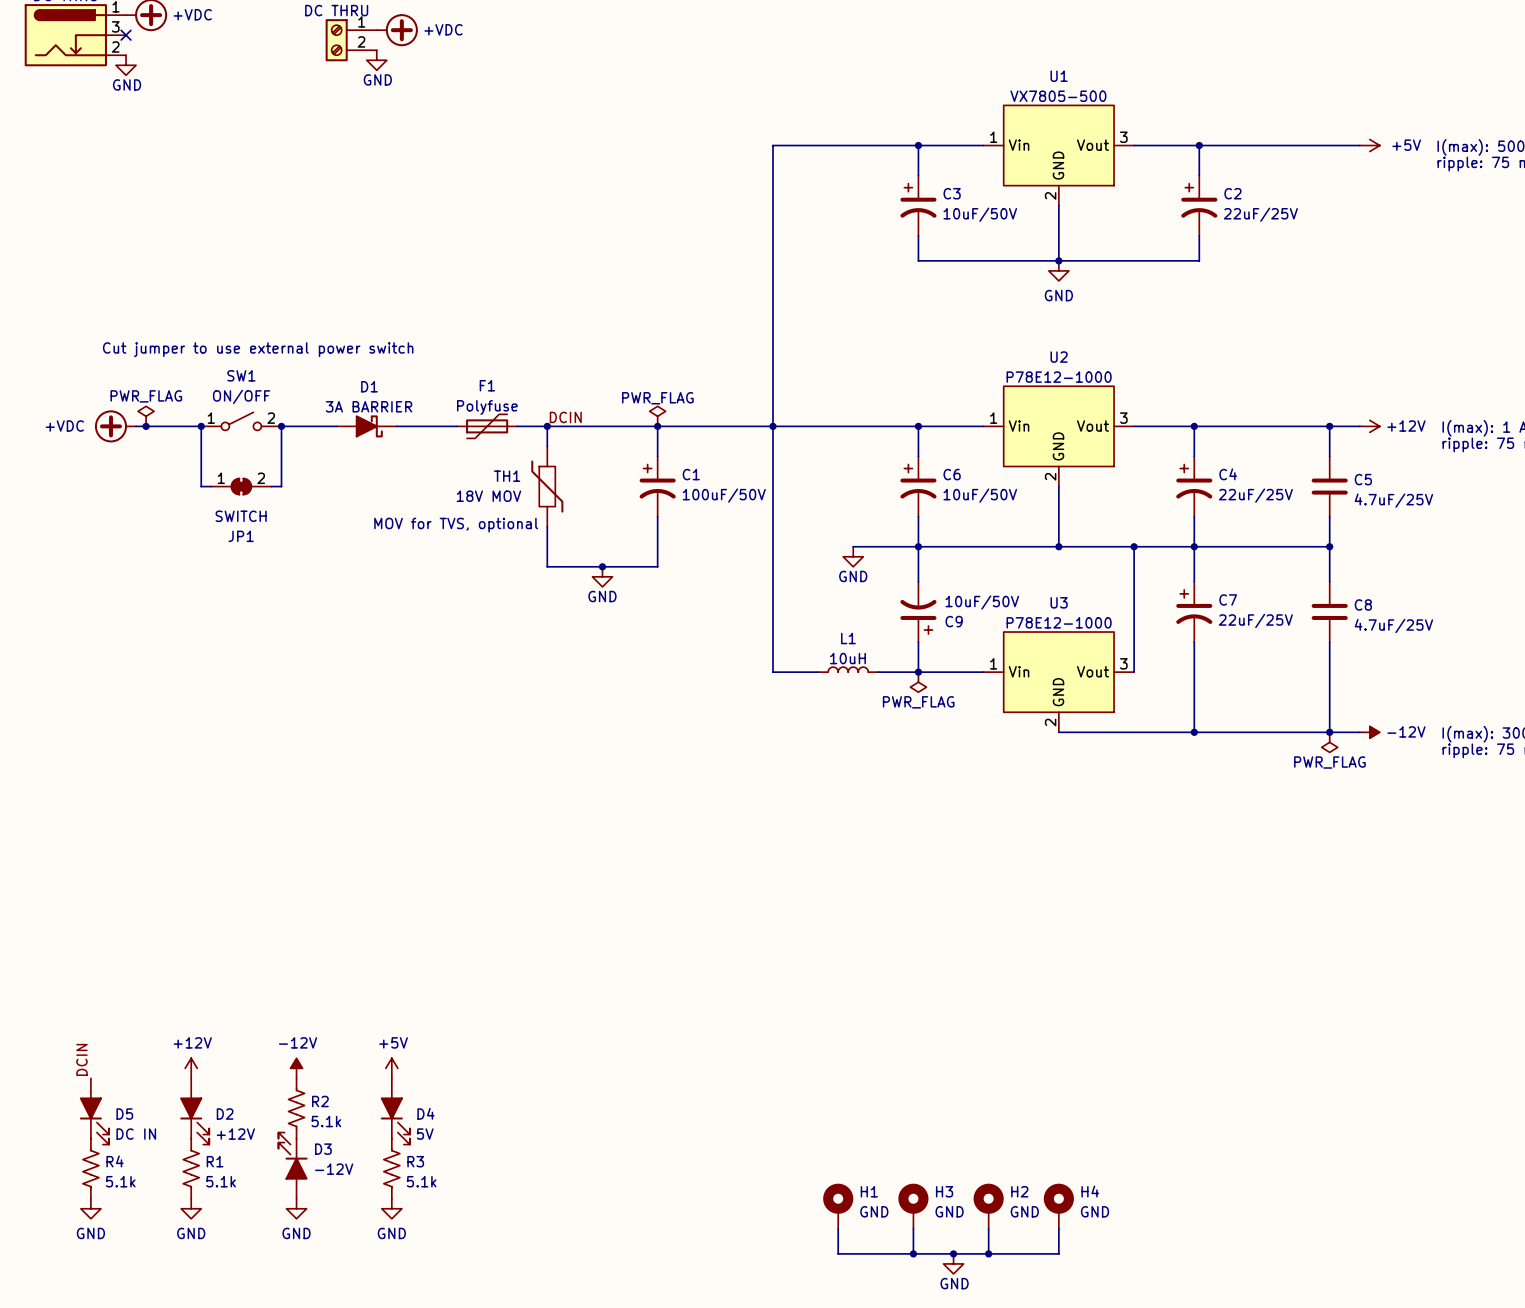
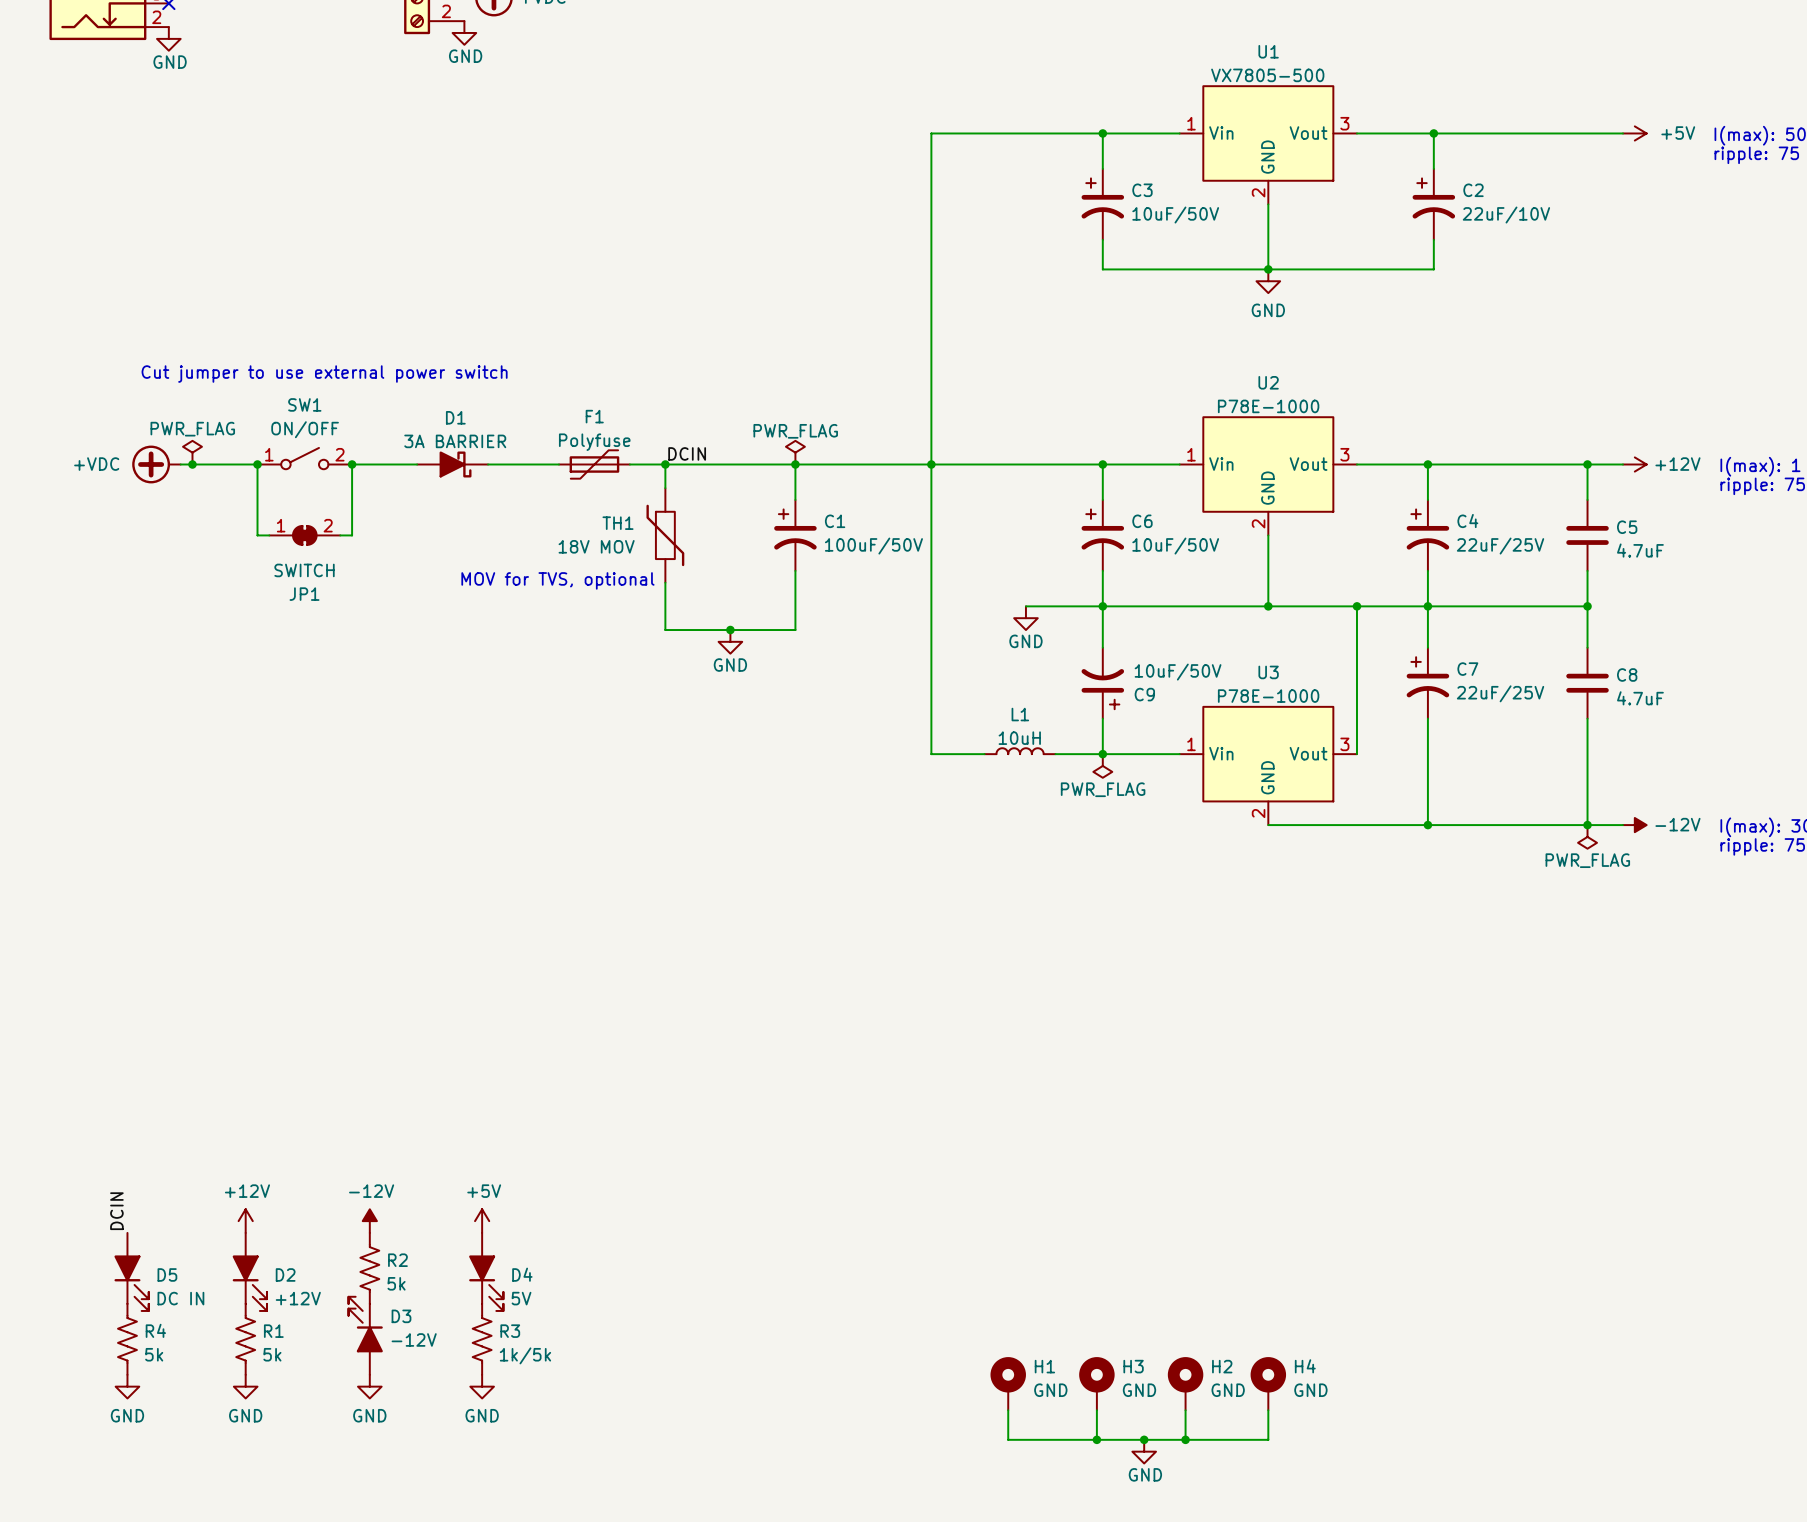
C2 value: 22uF/25V (1260, 214) -> 22uF/10V (1506, 215)
U2 value: P78E12-1000 (1059, 377) -> P78E-1000 (1268, 406)
C5 value: 4.7uF/25V (1393, 500) -> 4.7uF (1640, 550)
U3 value: P78E12-1000 (1059, 622) -> P78E-1000 (1268, 696)
C8 value: 4.7uF/25V (1393, 625) -> 4.7uF (1640, 698)
R2 value: 5.1k (326, 1121) -> 5k (396, 1283)
R4 value: 5.1k (120, 1181) -> 5k (154, 1354)
R1 value: 5.1k (221, 1181) -> 5k (272, 1354)
R3 value: 5.1k (421, 1181) -> 1k/5k (525, 1355)

